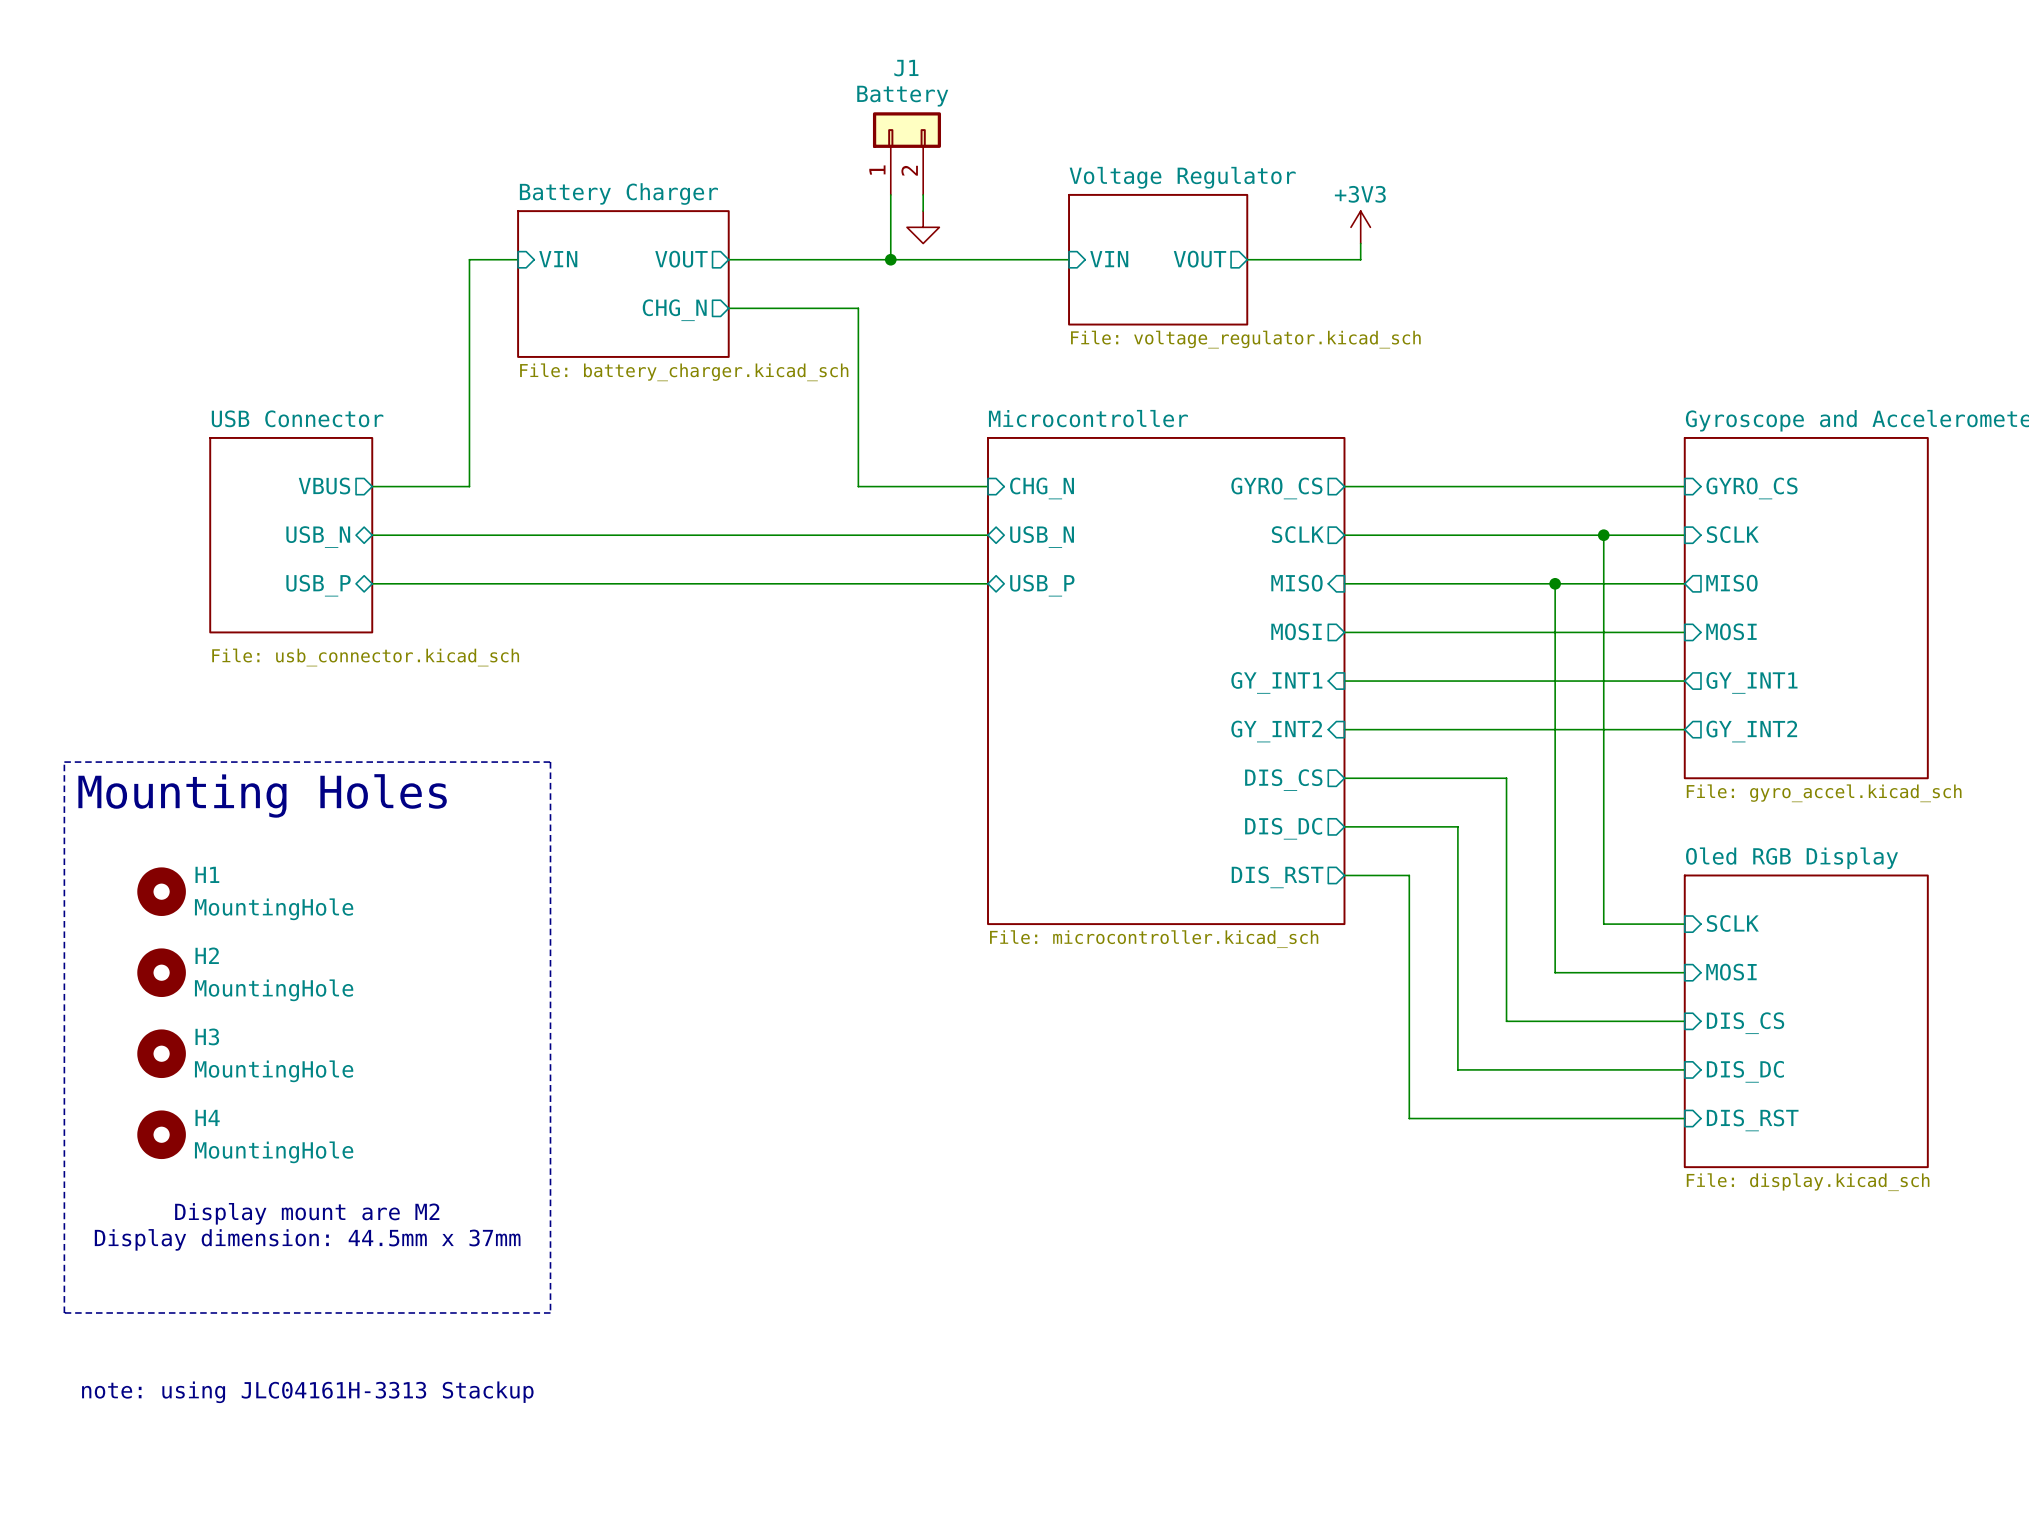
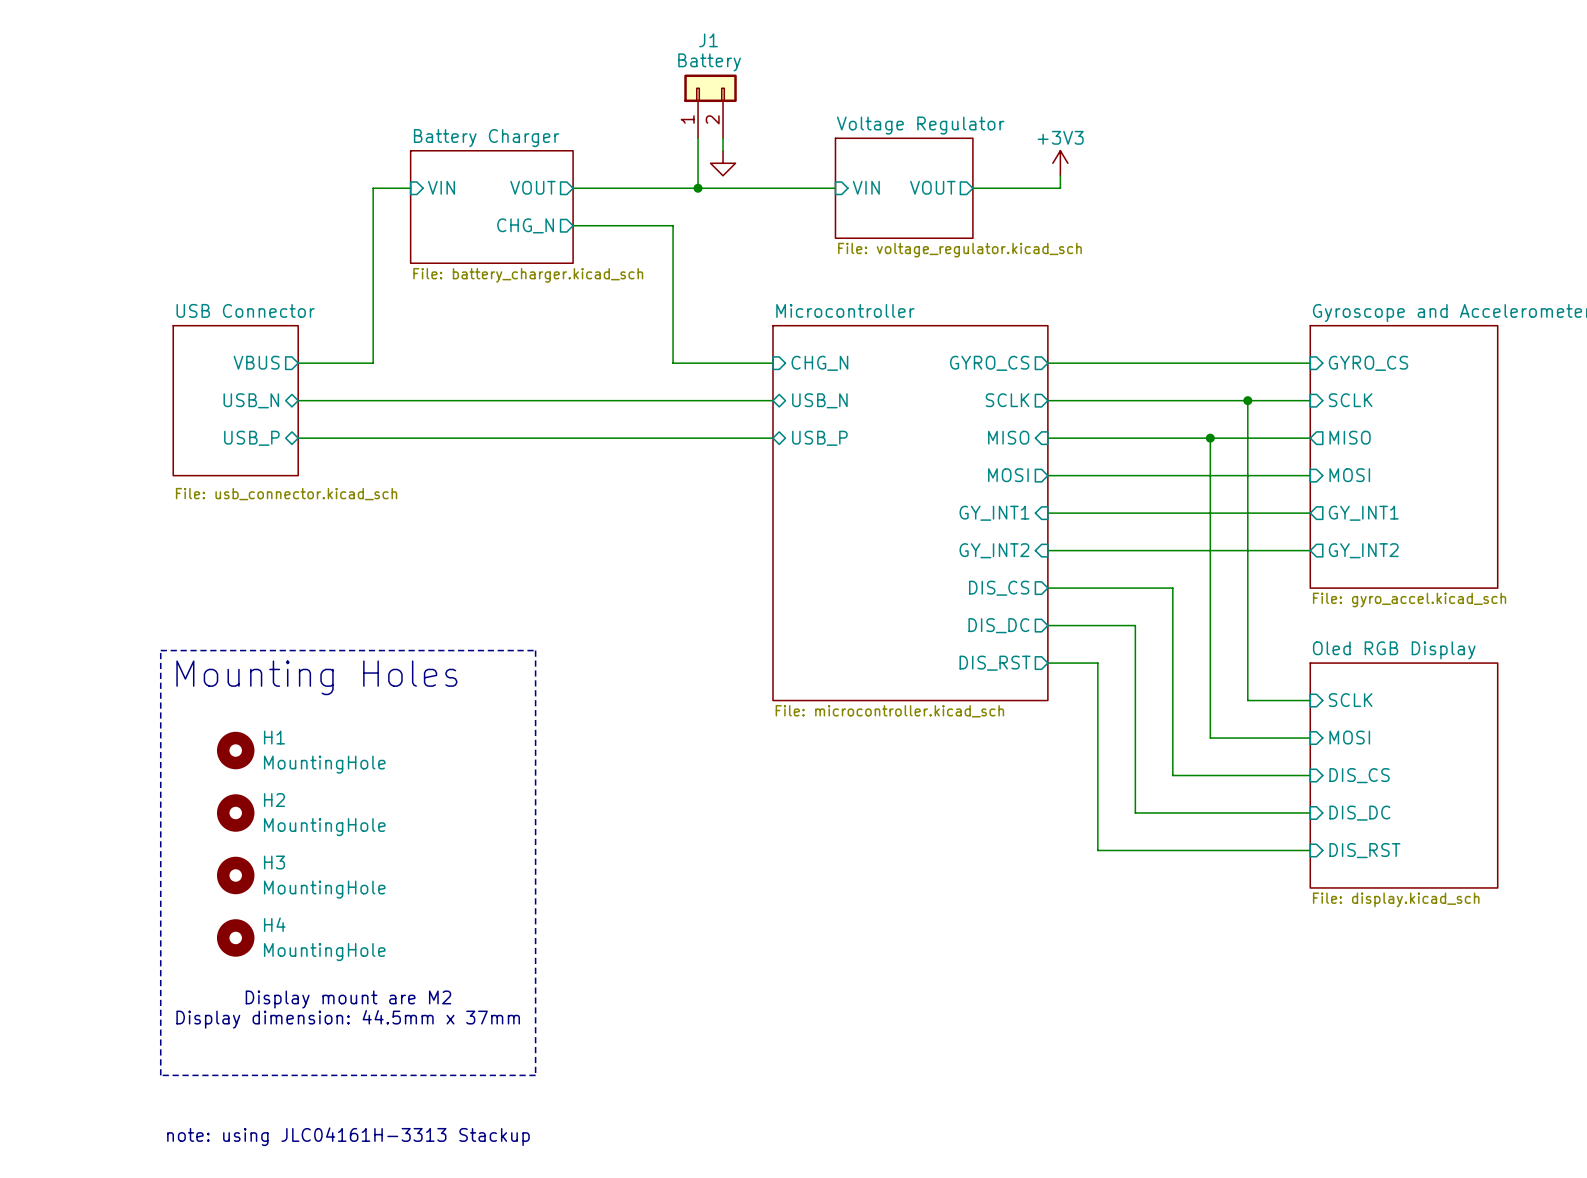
line: (64, 762) (550, 762) (550, 1312) (64, 1312) (64, 762) -> (160, 650) (535, 650) (535, 1075) (160, 1075) (160, 650)
text position: Mounting Holes (262, 795) -> Mounting Holes (316, 677)
H1 position: (161, 891) -> (235, 750)
H2 position: (161, 972) -> (235, 813)
H3 position: (161, 1053) -> (235, 875)
H4 position: (161, 1134) -> (235, 937)
text position: Display mount are M2 (307, 1213) -> Display mount are M2 (348, 999)
text position: Display dimension: 44.5mm x 37mm (307, 1239) -> Display dimension: 44.5mm x 37mm (348, 1019)
text position: note: using JLC04161H-3313 Stackup (307, 1392) -> note: using JLC04161H-3313 Stackup (348, 1136)

